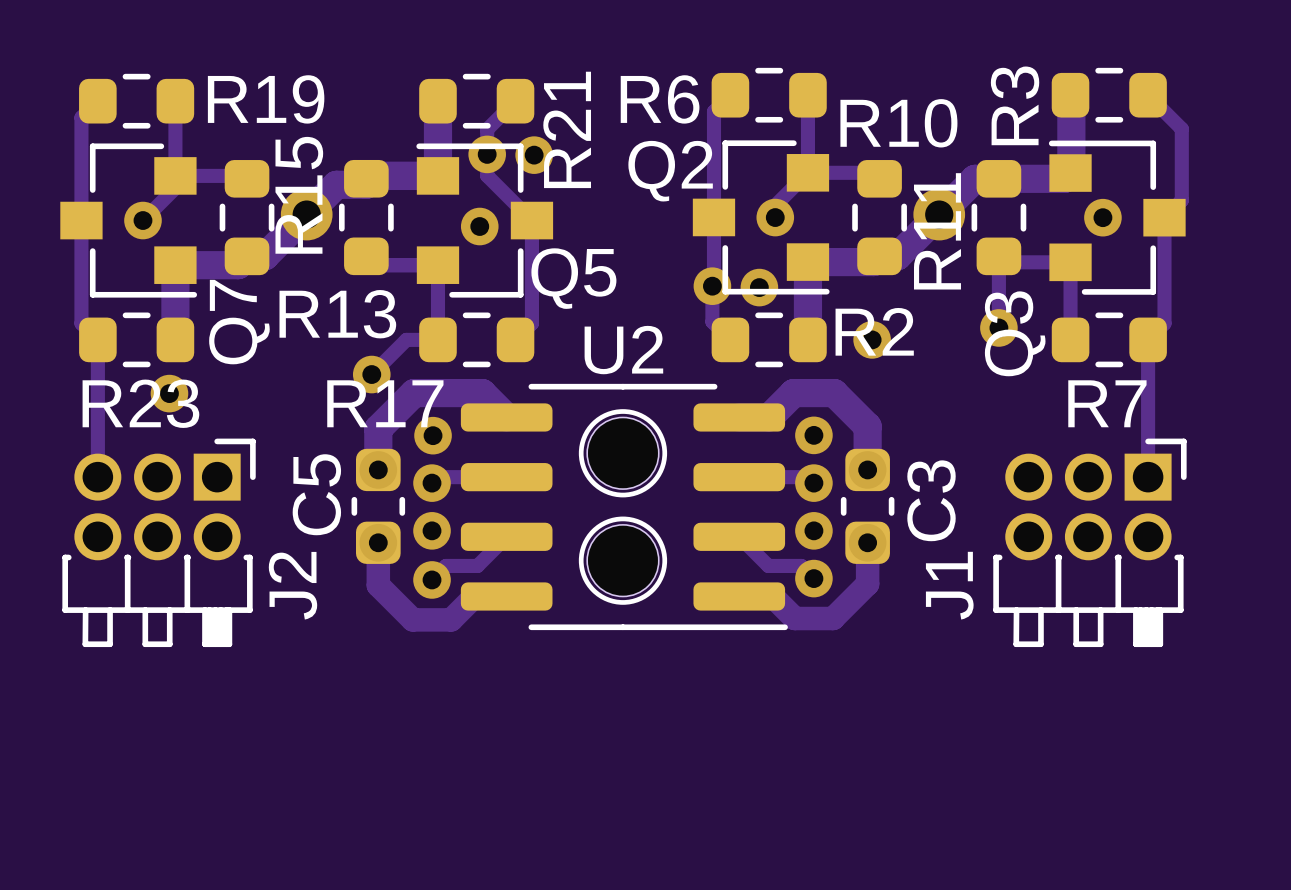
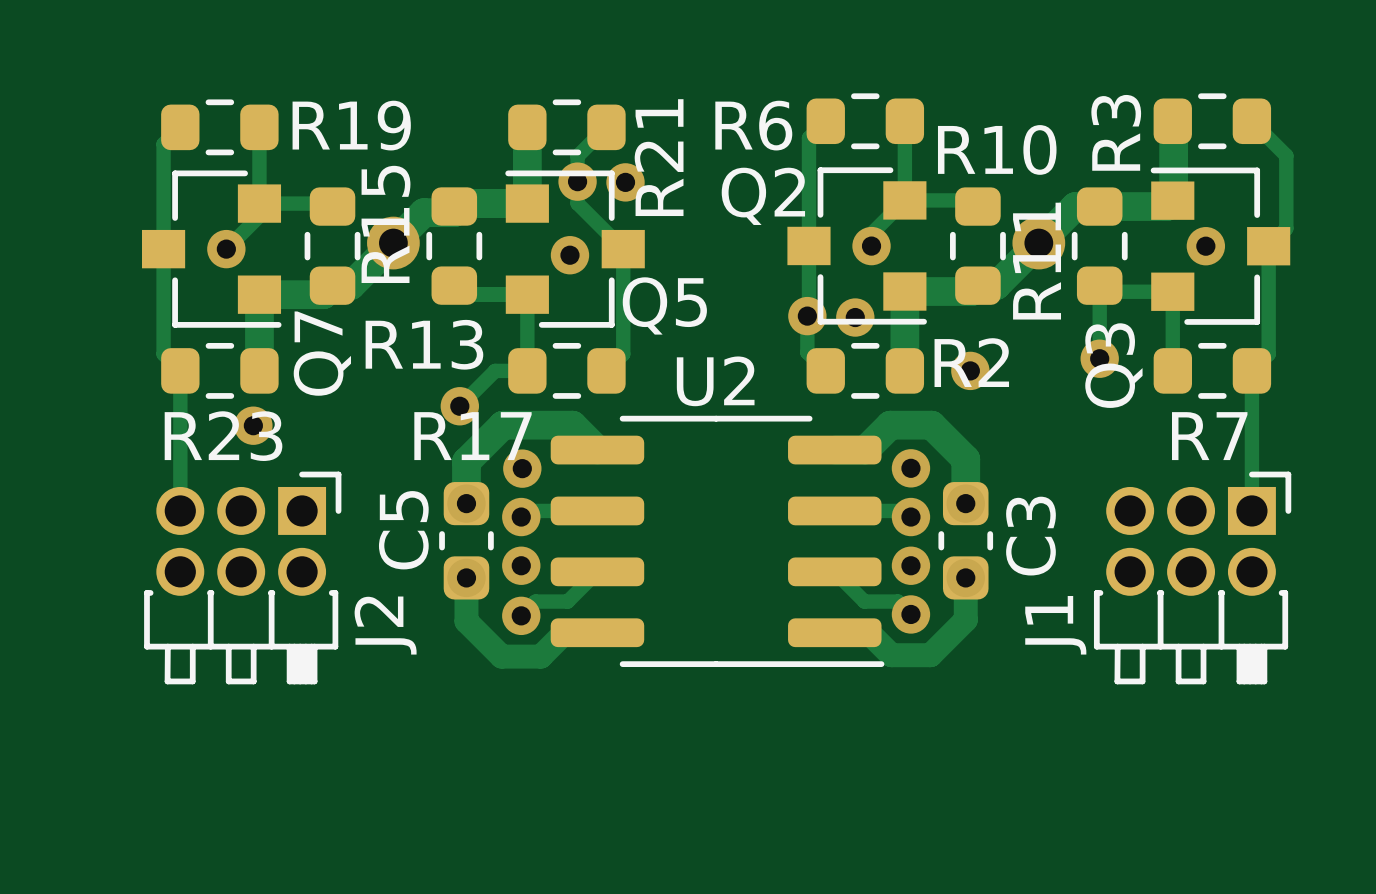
drawing: [578, 409, 668, 605] -> none
part: (622, 453) -> none
part: (622, 560) -> none

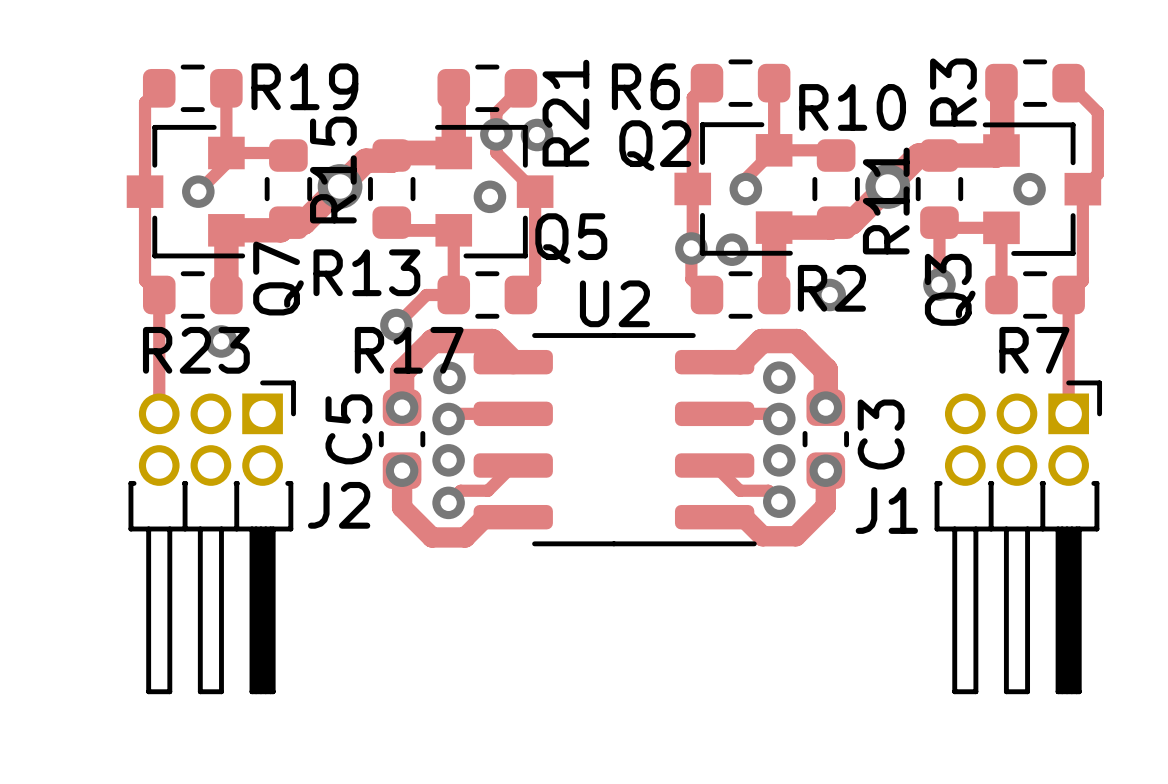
J2 footprint: [144, 471, 342, 685] -> [128, 380, 296, 695]
J1 footprint: [1093, 471, 1292, 685] -> [934, 380, 1103, 695]

